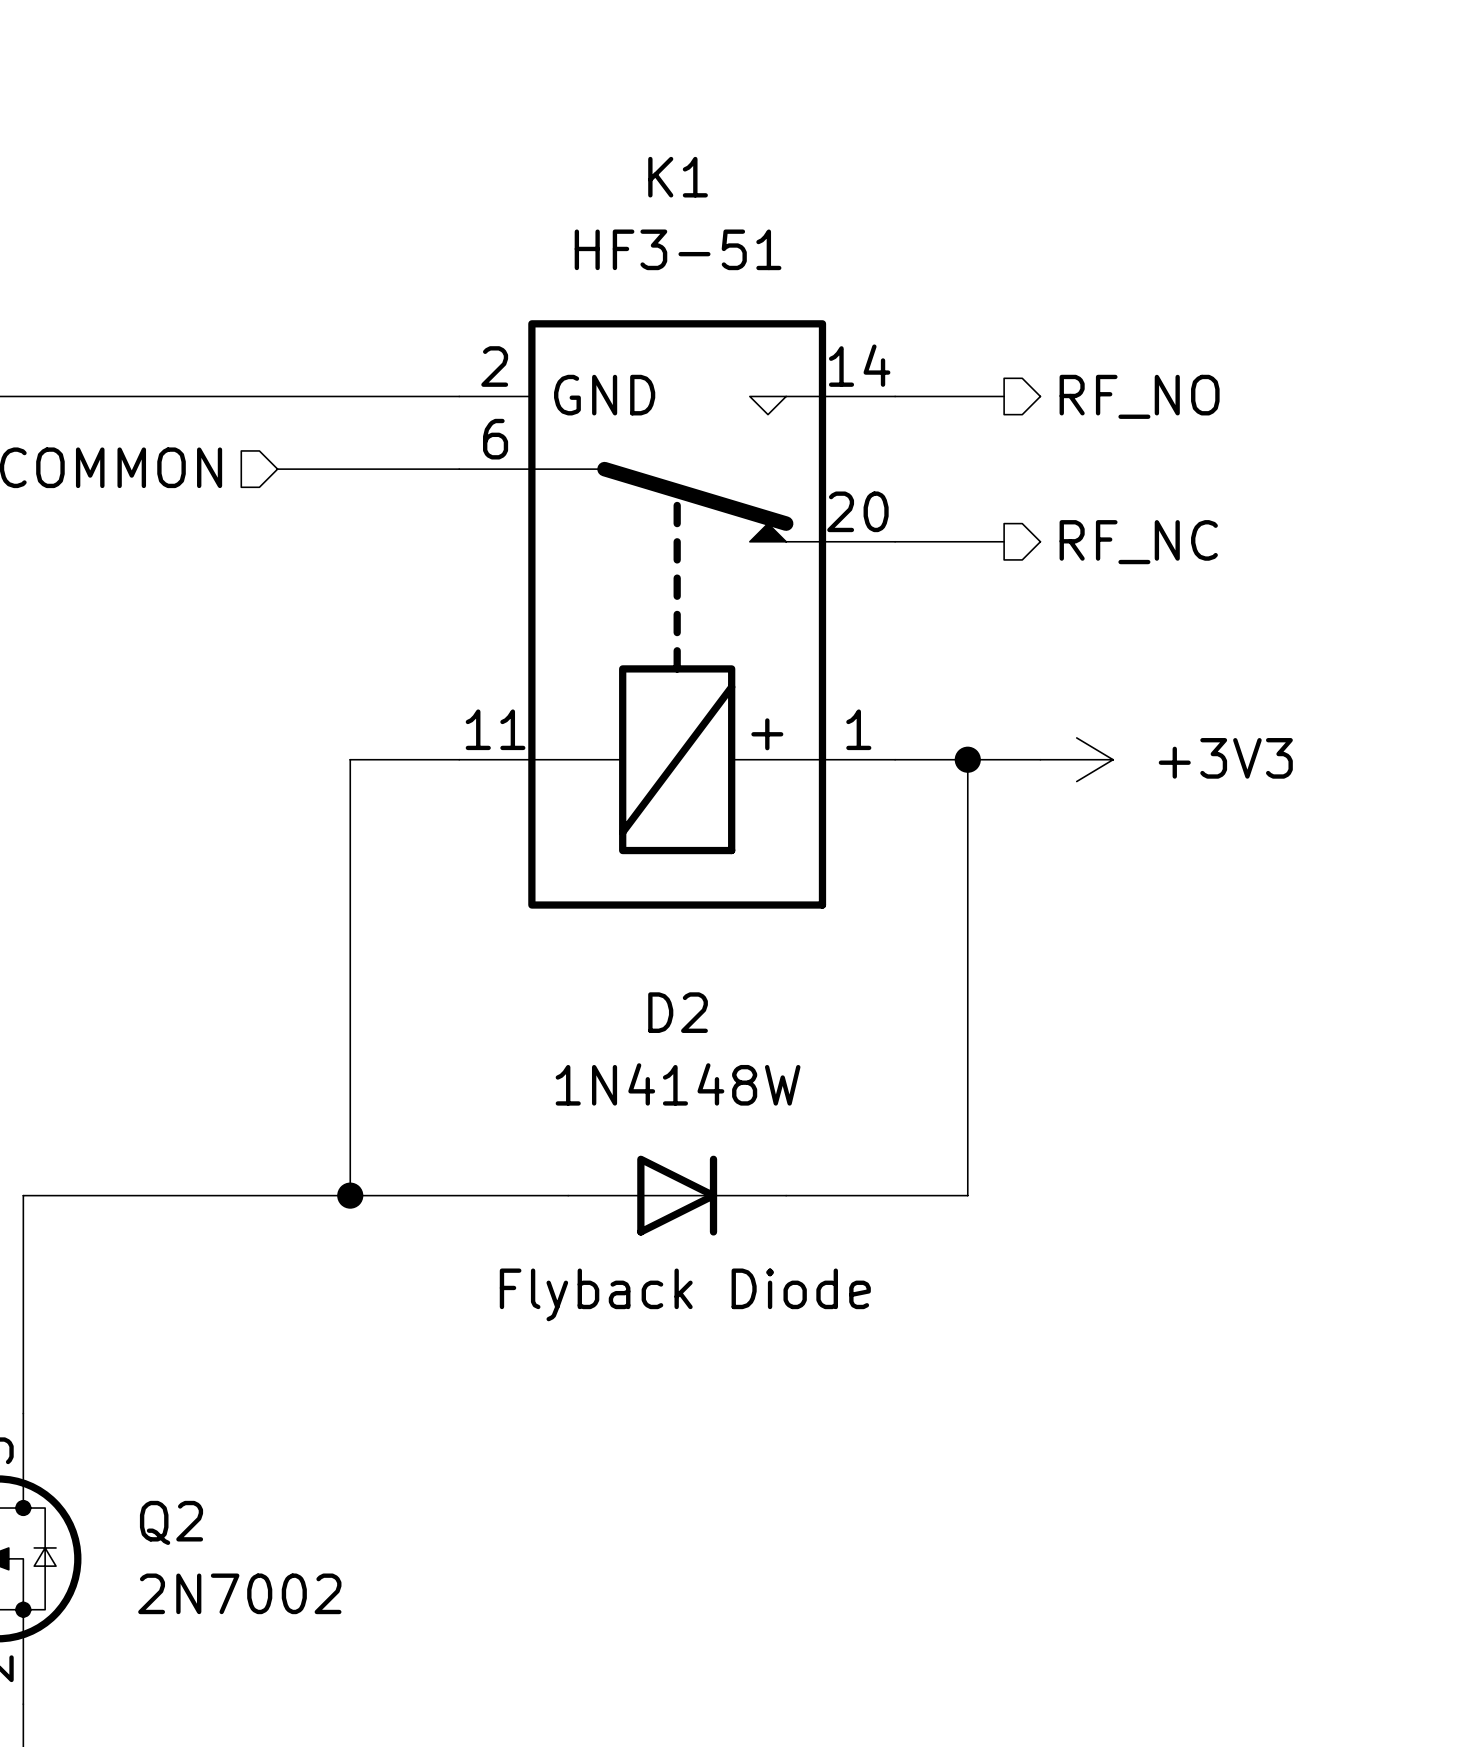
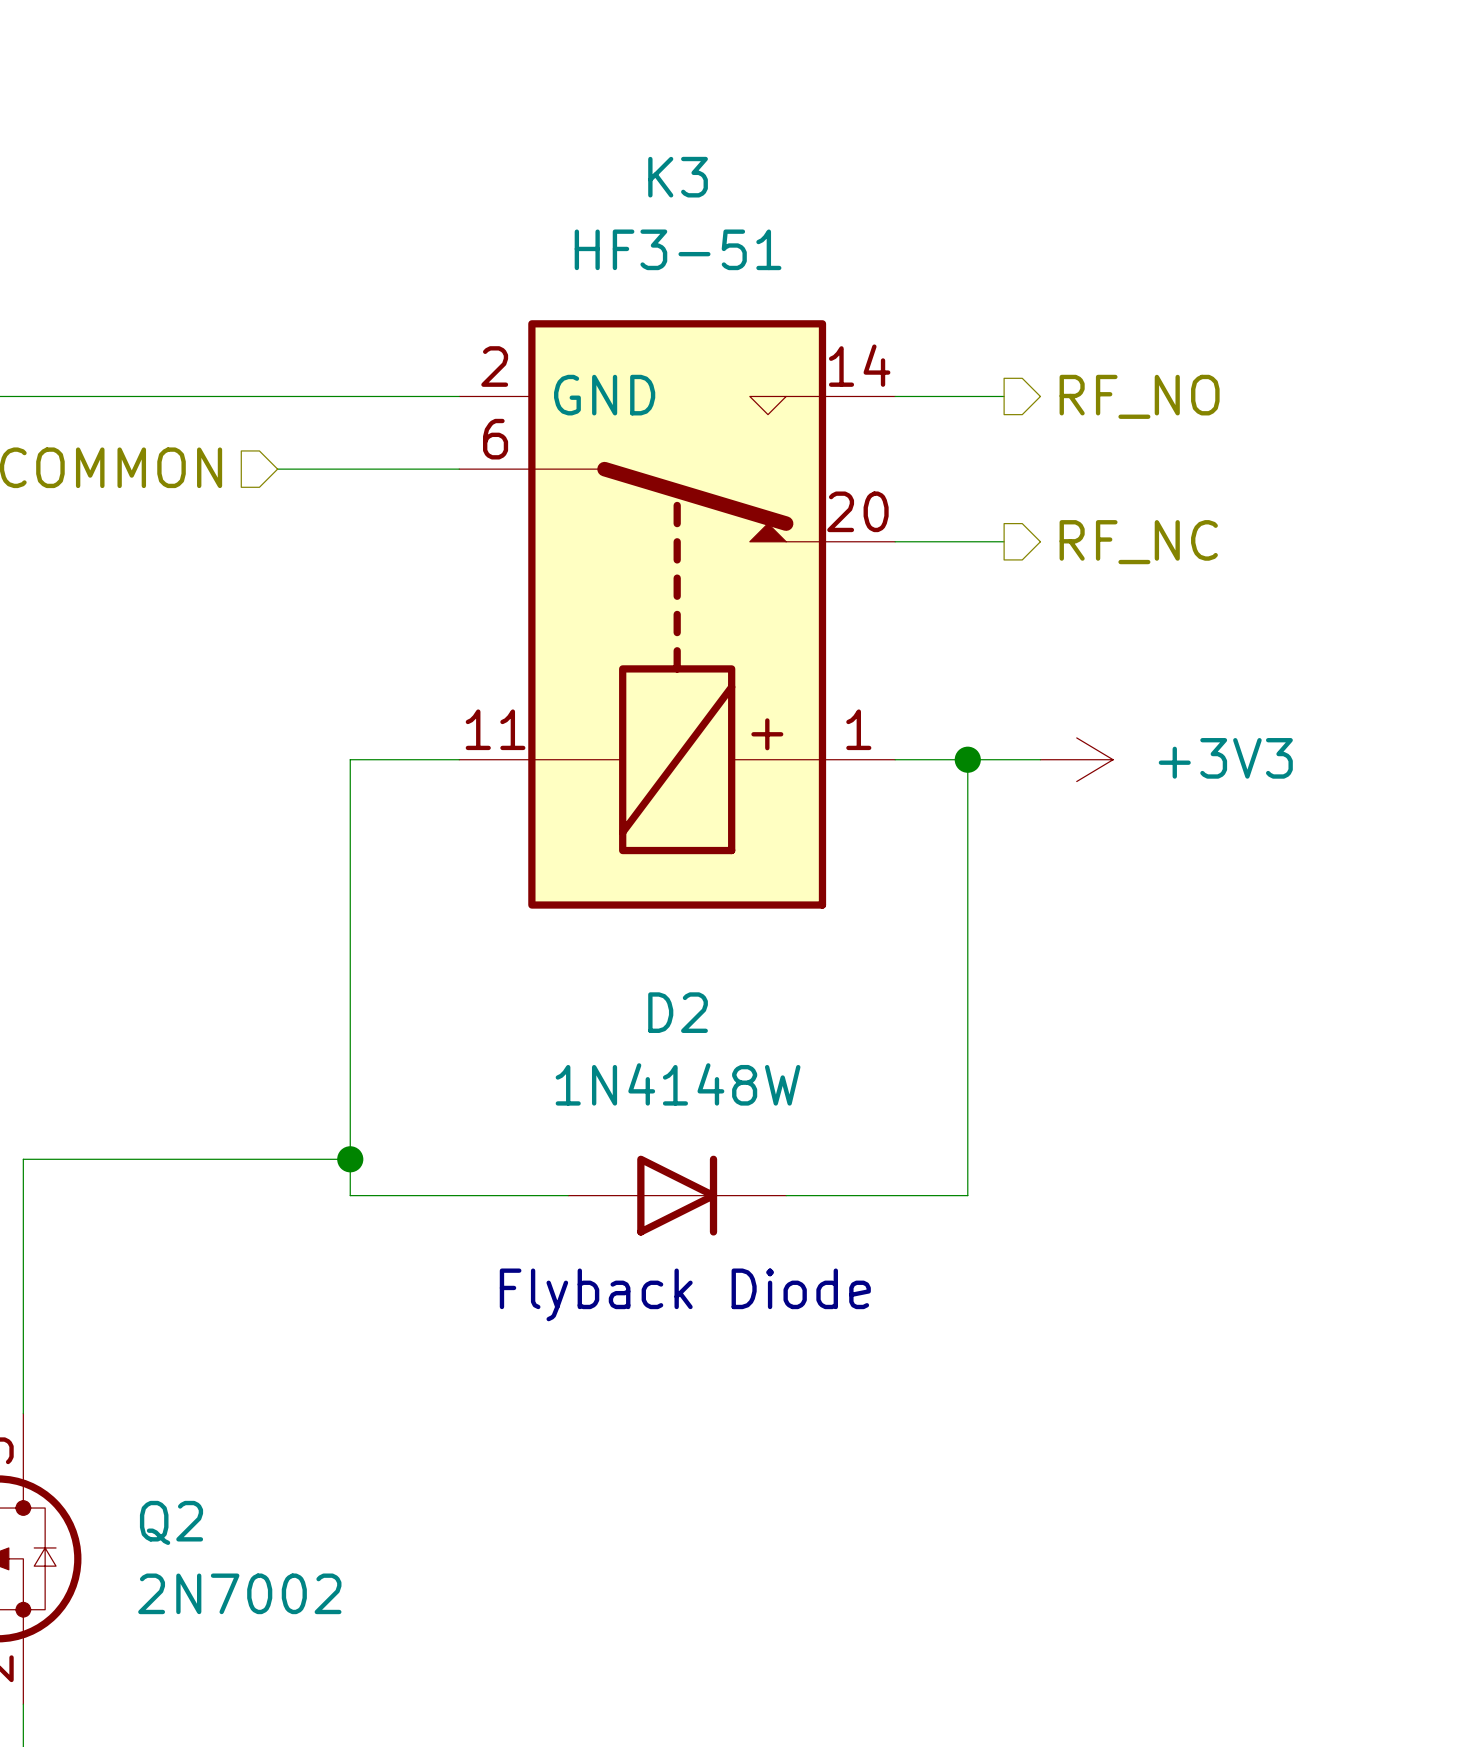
K1 name: K1 (678, 177) -> K3 (678, 177)
wire: (23, 1195) (350, 1195) -> (23, 1195) (23, 1159) (350, 1159)
junction position: (350, 1195) -> (350, 1159)

